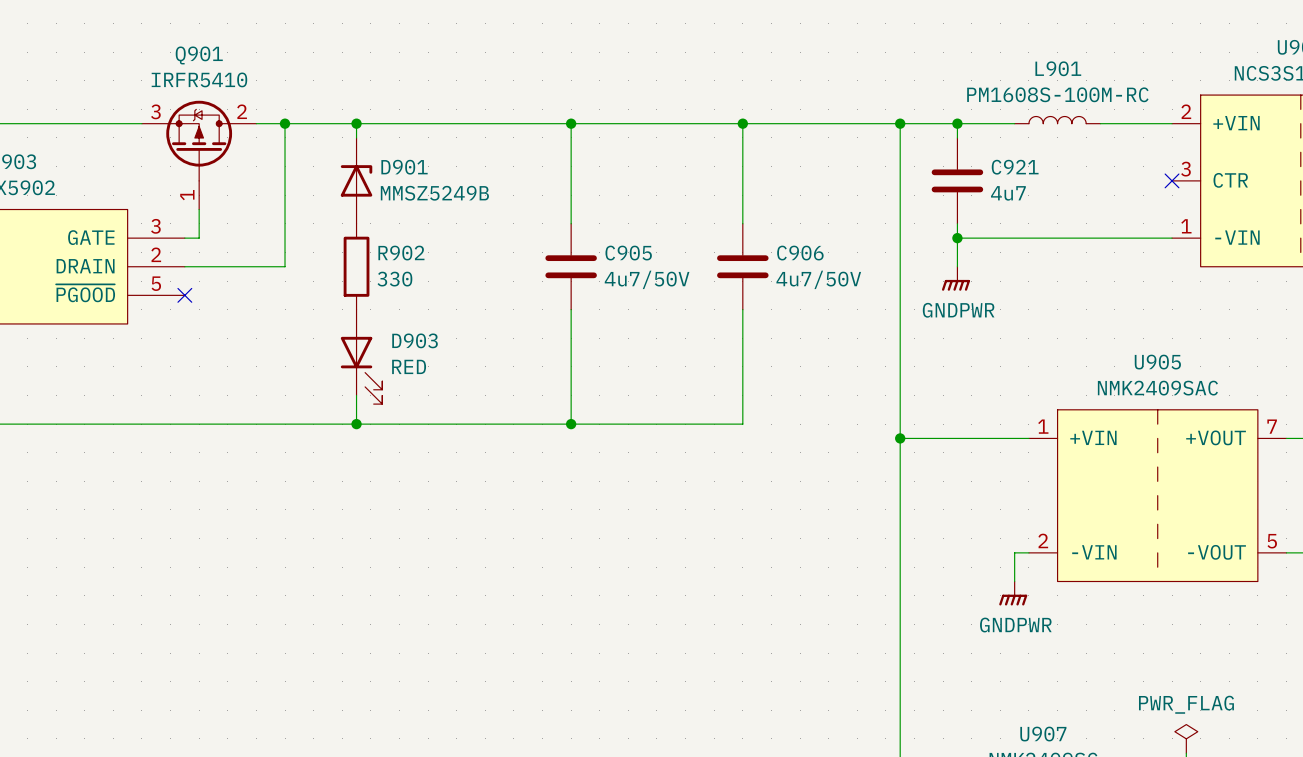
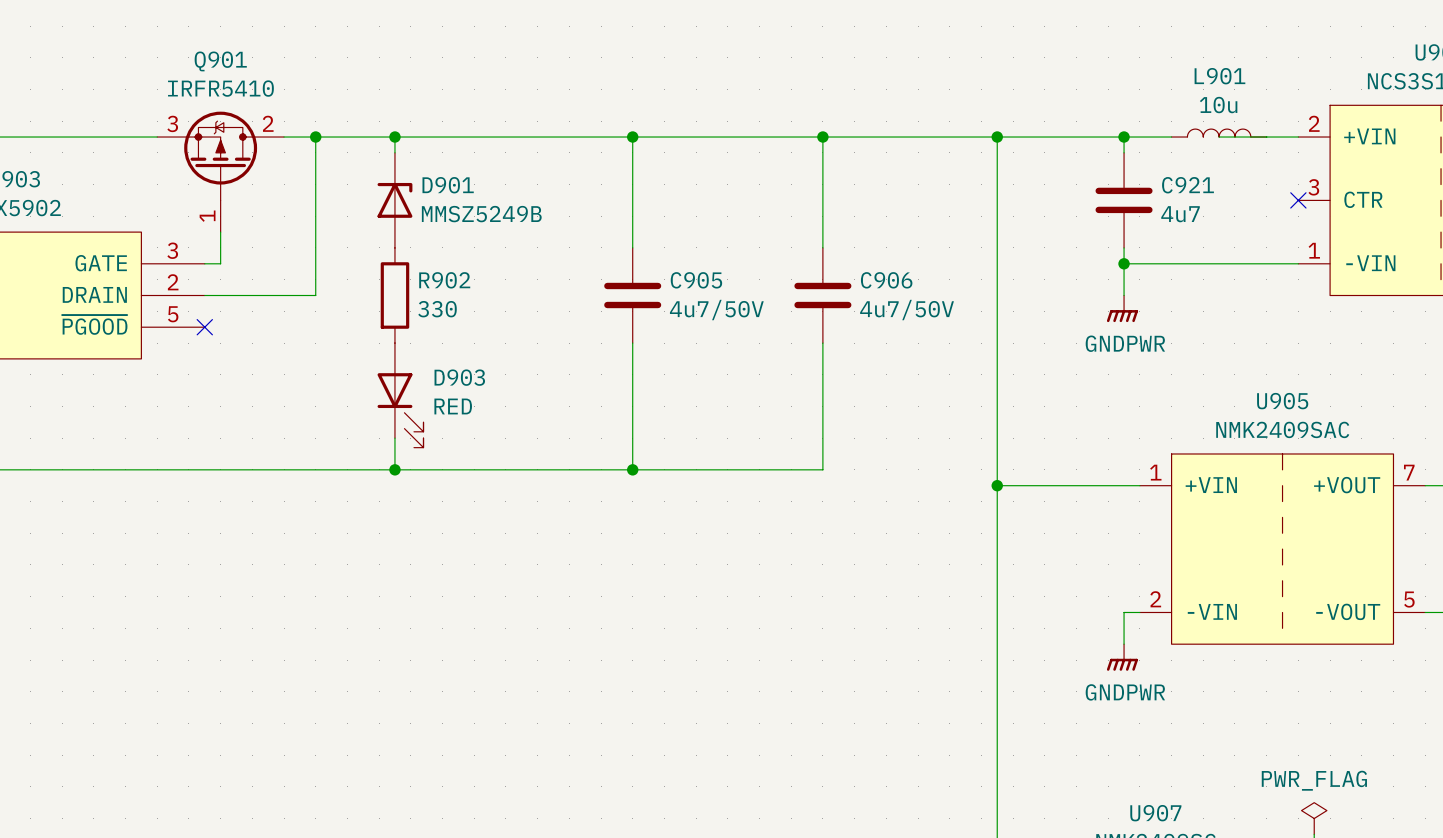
L901 value: PM1608S-100M-RC (1057, 94) -> 10u (1218, 105)
L901 position: (1057, 120) -> (1219, 133)
wire: (957, 123) (957, 137) -> none
junction position: (957, 123) -> (1124, 137)
wire: none -> (1171, 137) (1124, 137) (1124, 152)
C921 position: (957, 180) -> (1124, 200)
wire: (957, 223) (957, 266) -> (1124, 247) (1124, 295)
wire: (957, 238) (1014, 238) -> none
junction position: (957, 238) -> (1124, 263)
power symbol position: GNDPWR (955, 278) -> GNDPWR (1122, 308)

